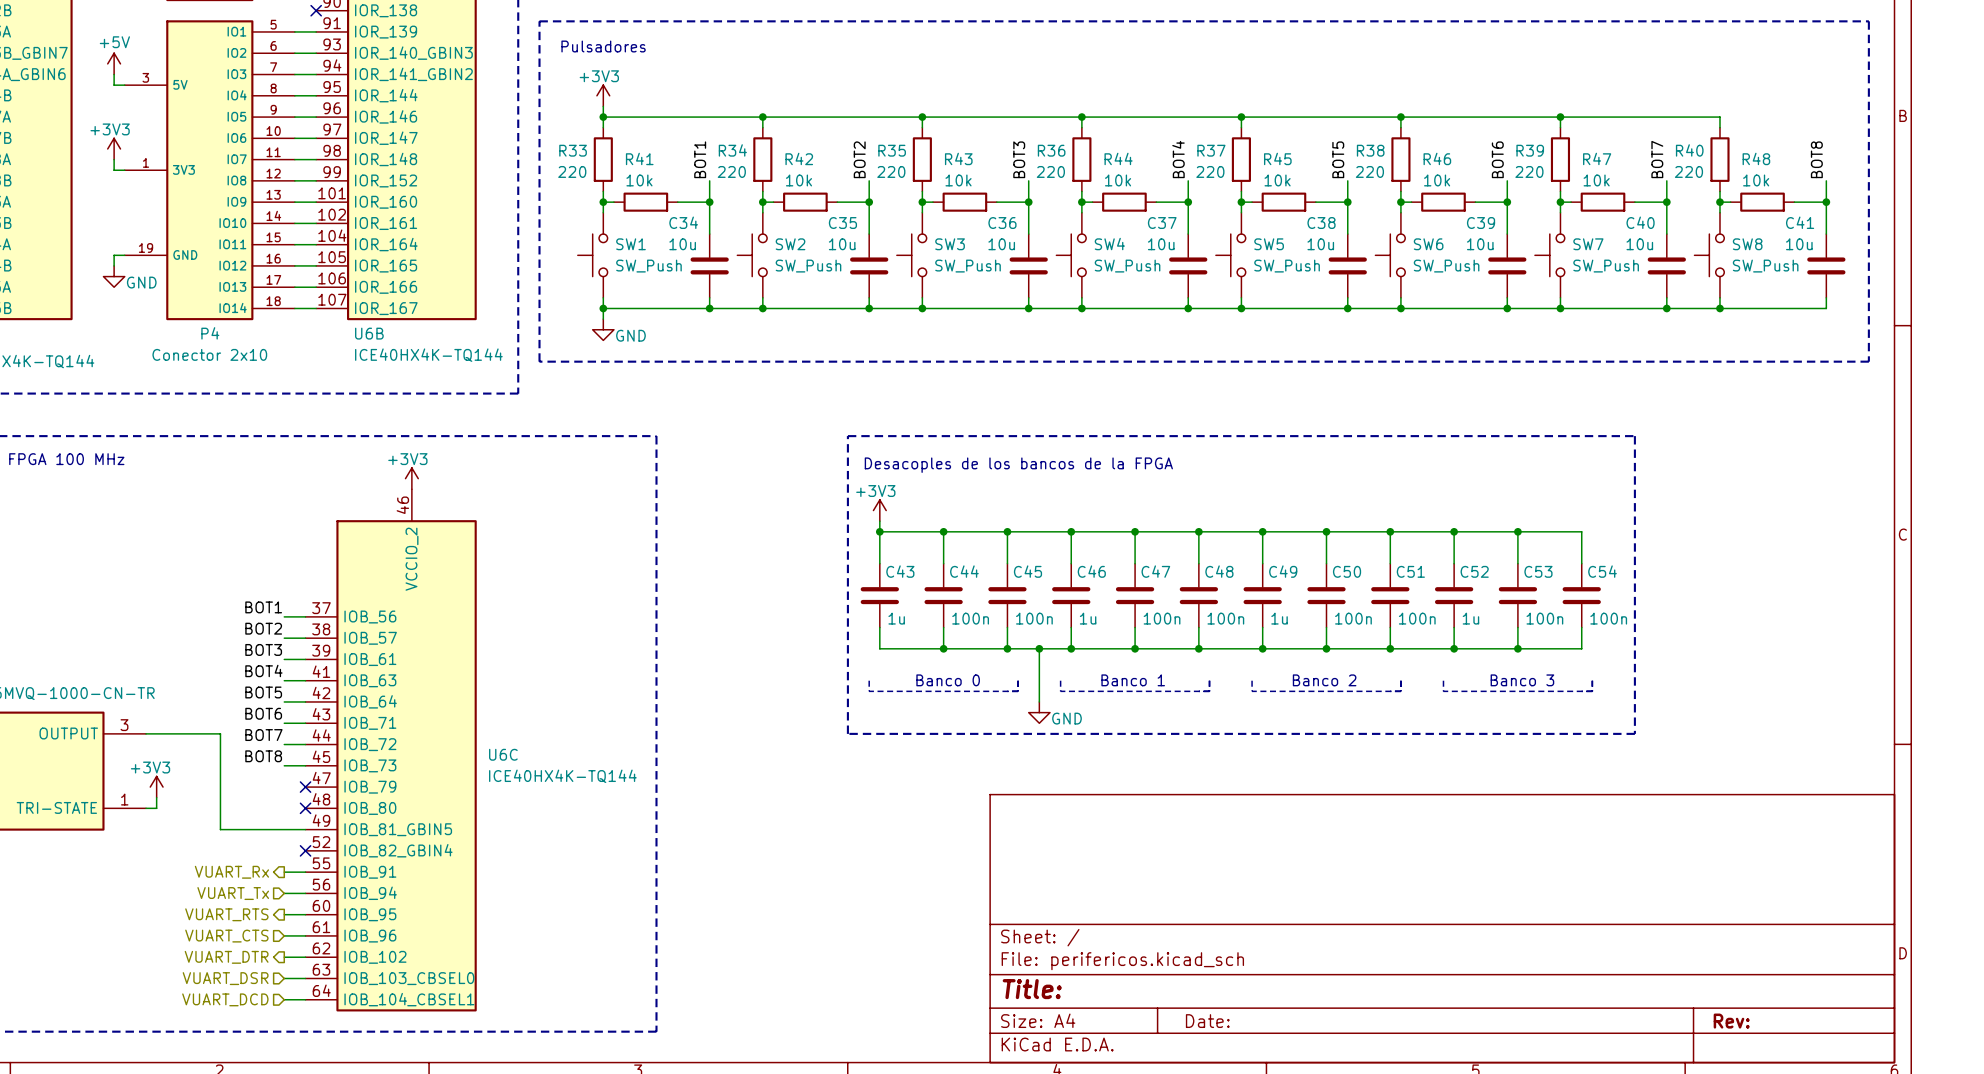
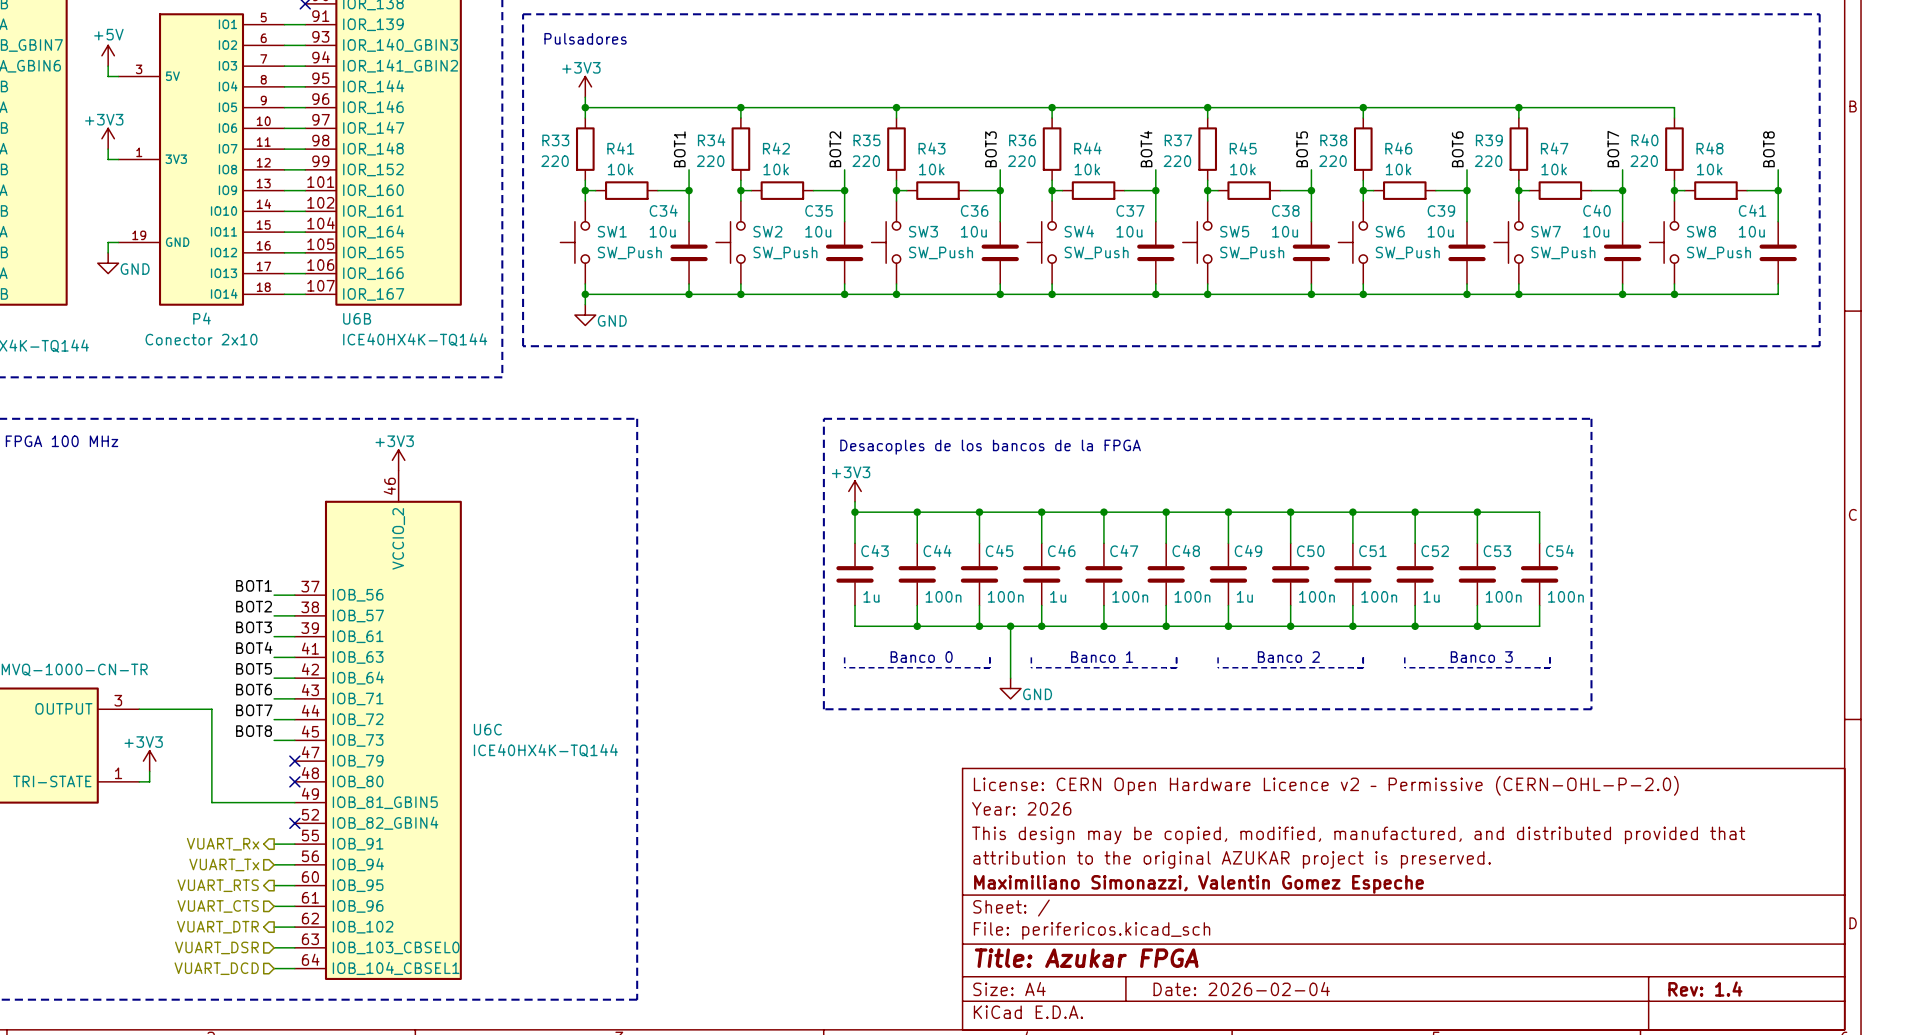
title block: none -> License: CERN Open Hardware Licence v2 – Permissive (CERN-OHL-P-2.0) (1326, 785)
title block: none -> Year: 2026 (1021, 808)
title block: none -> This design may be copied, modified, manufactured, and distributed provided that (1358, 835)
title block: none -> attribution to the original AZUKAR project is preserved. (1232, 859)
title block: none -> Maximiliano Simonazzi, Valentin Gomez Espeche (1199, 884)
title block: Title: (1032, 989) -> Title: Azukar FPGA (1086, 958)
title block: Date: (1207, 1021) -> Date: 2026-02-04 (1241, 989)
title block: Rev: (1731, 1021) -> Rev: 1.4 (1705, 989)

